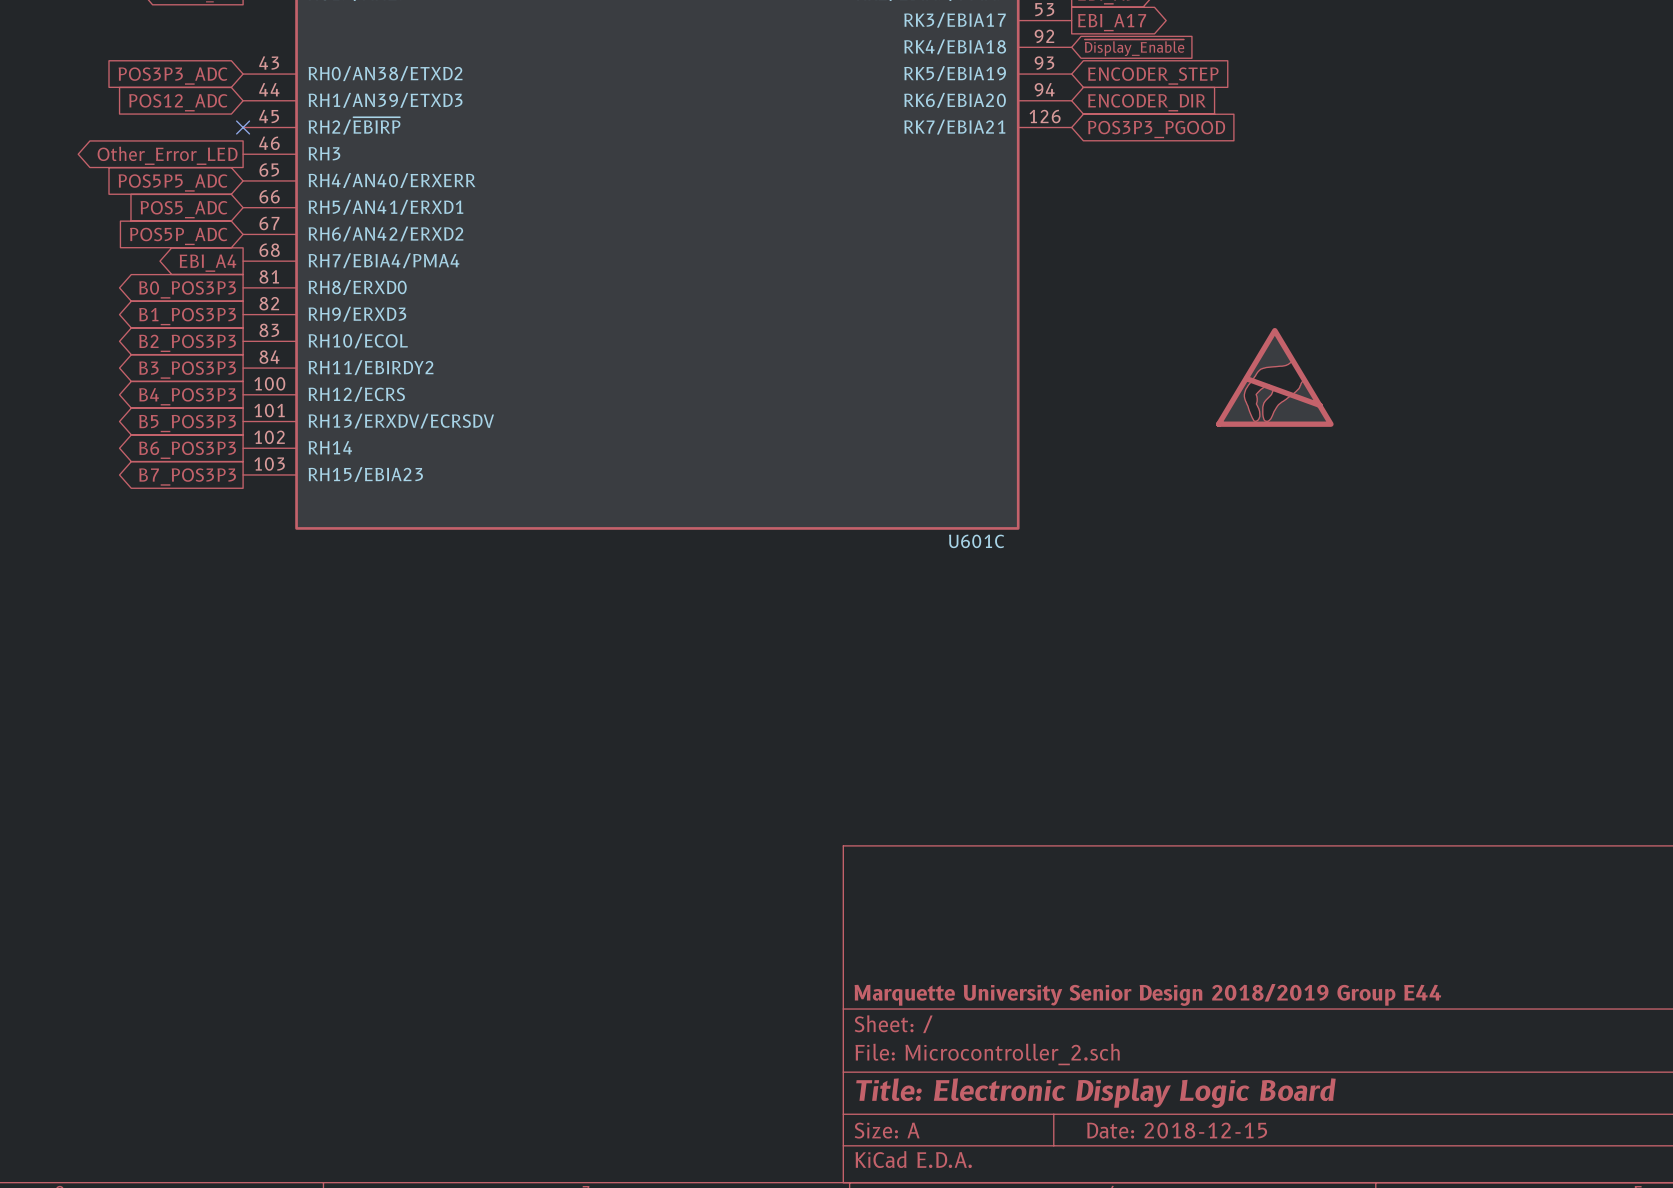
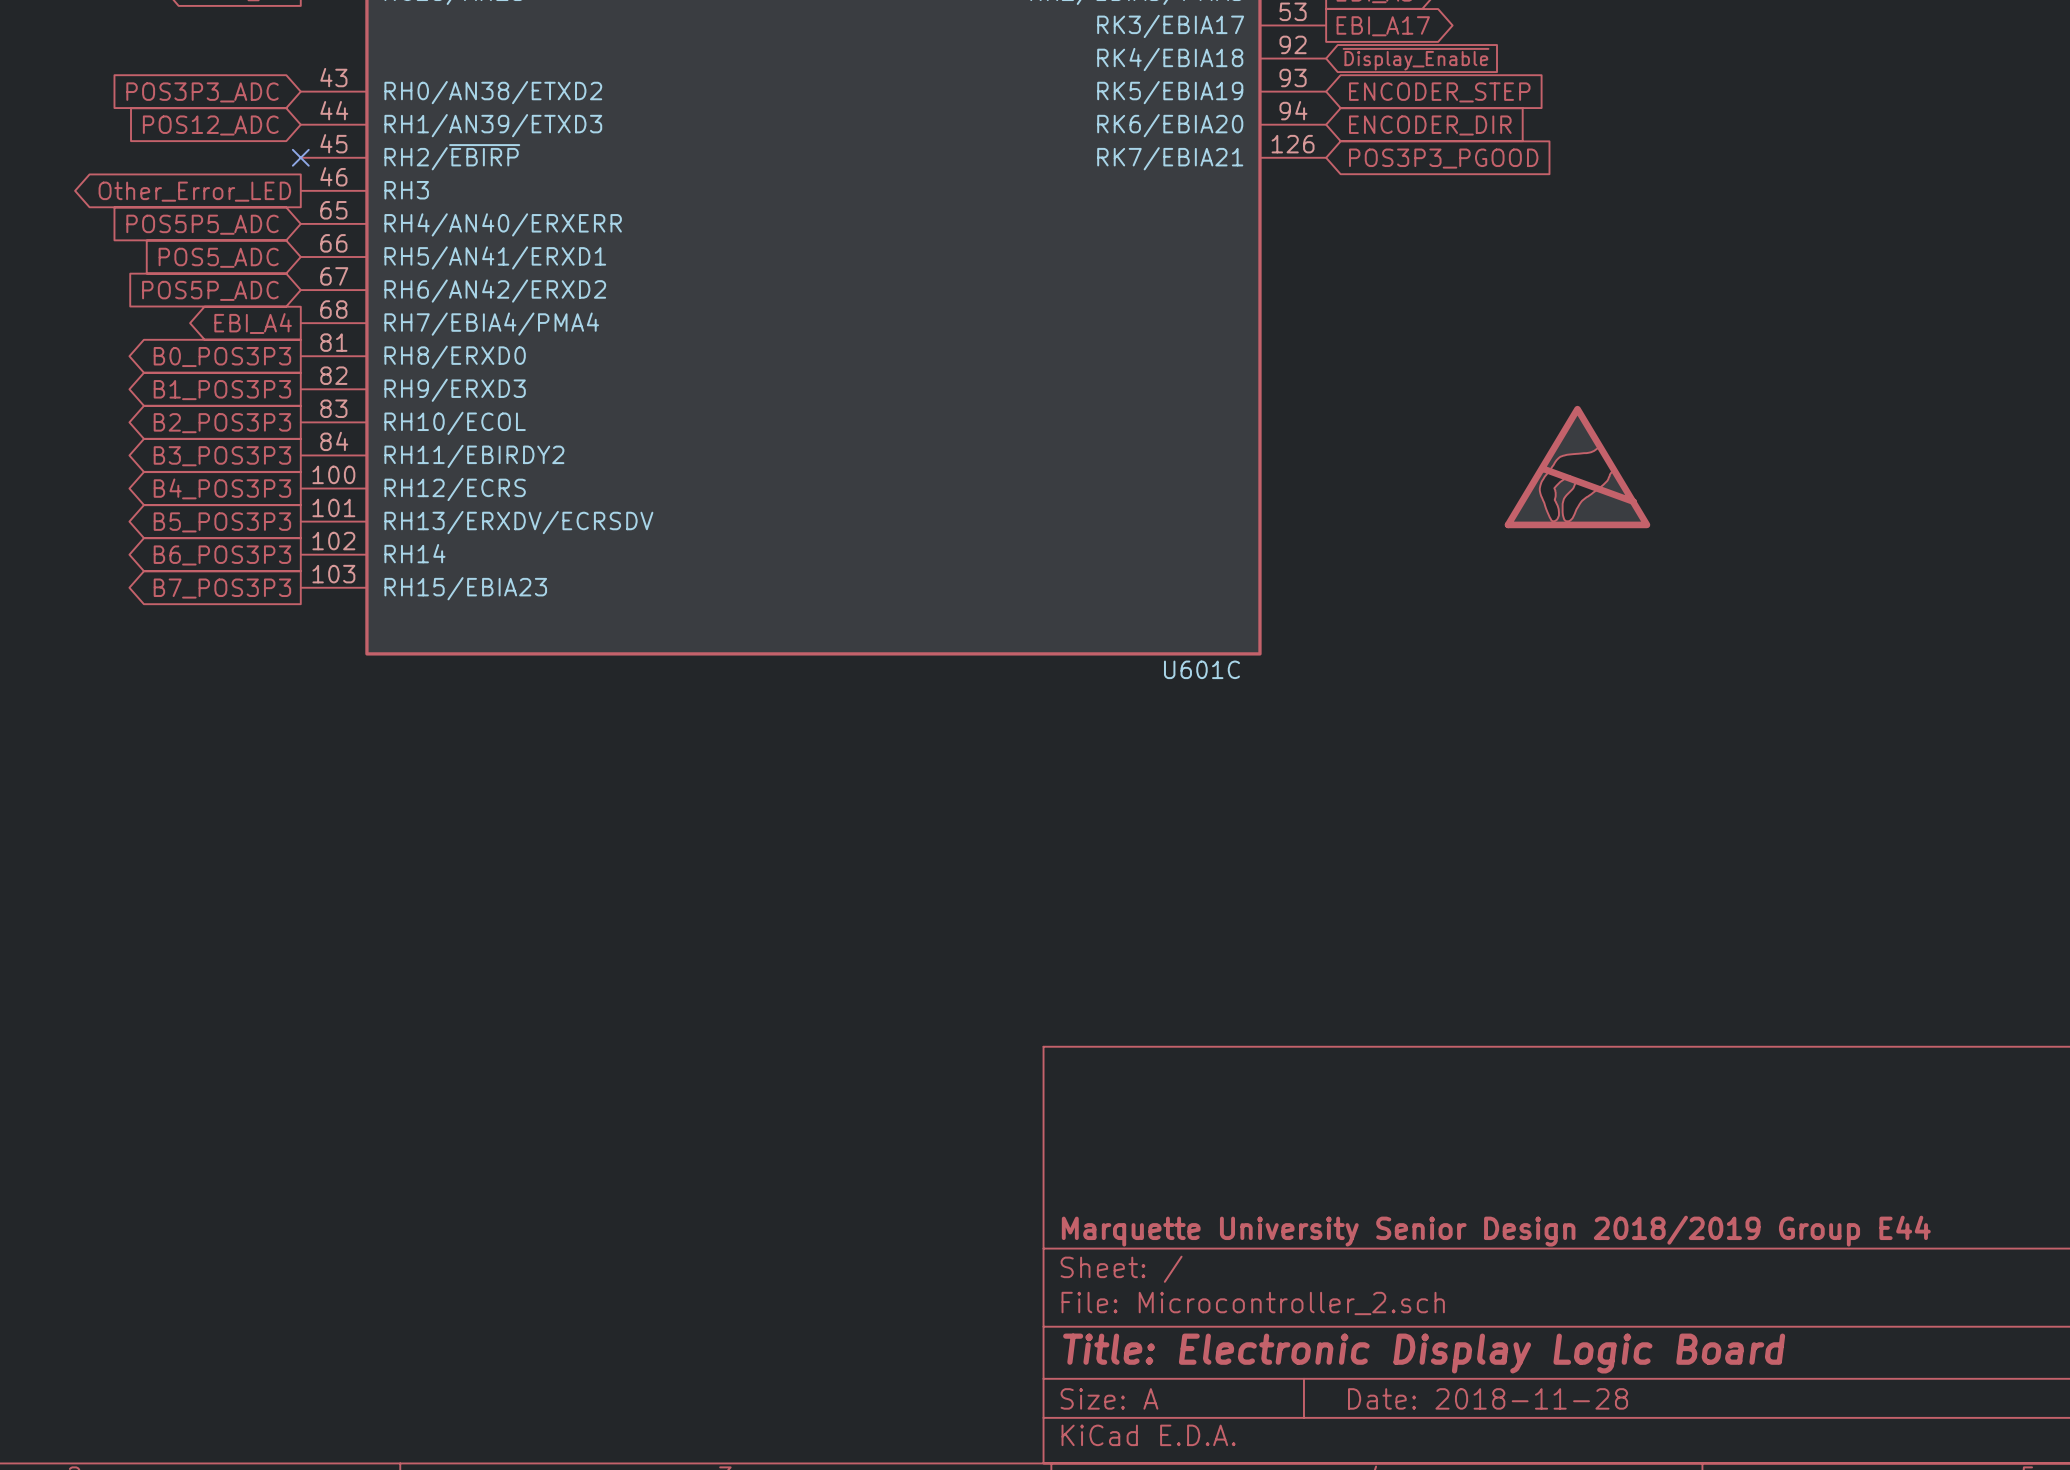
title block: Date: 2018-12-15 (1177, 1130) -> Date: 2018-11-28 (1488, 1398)

